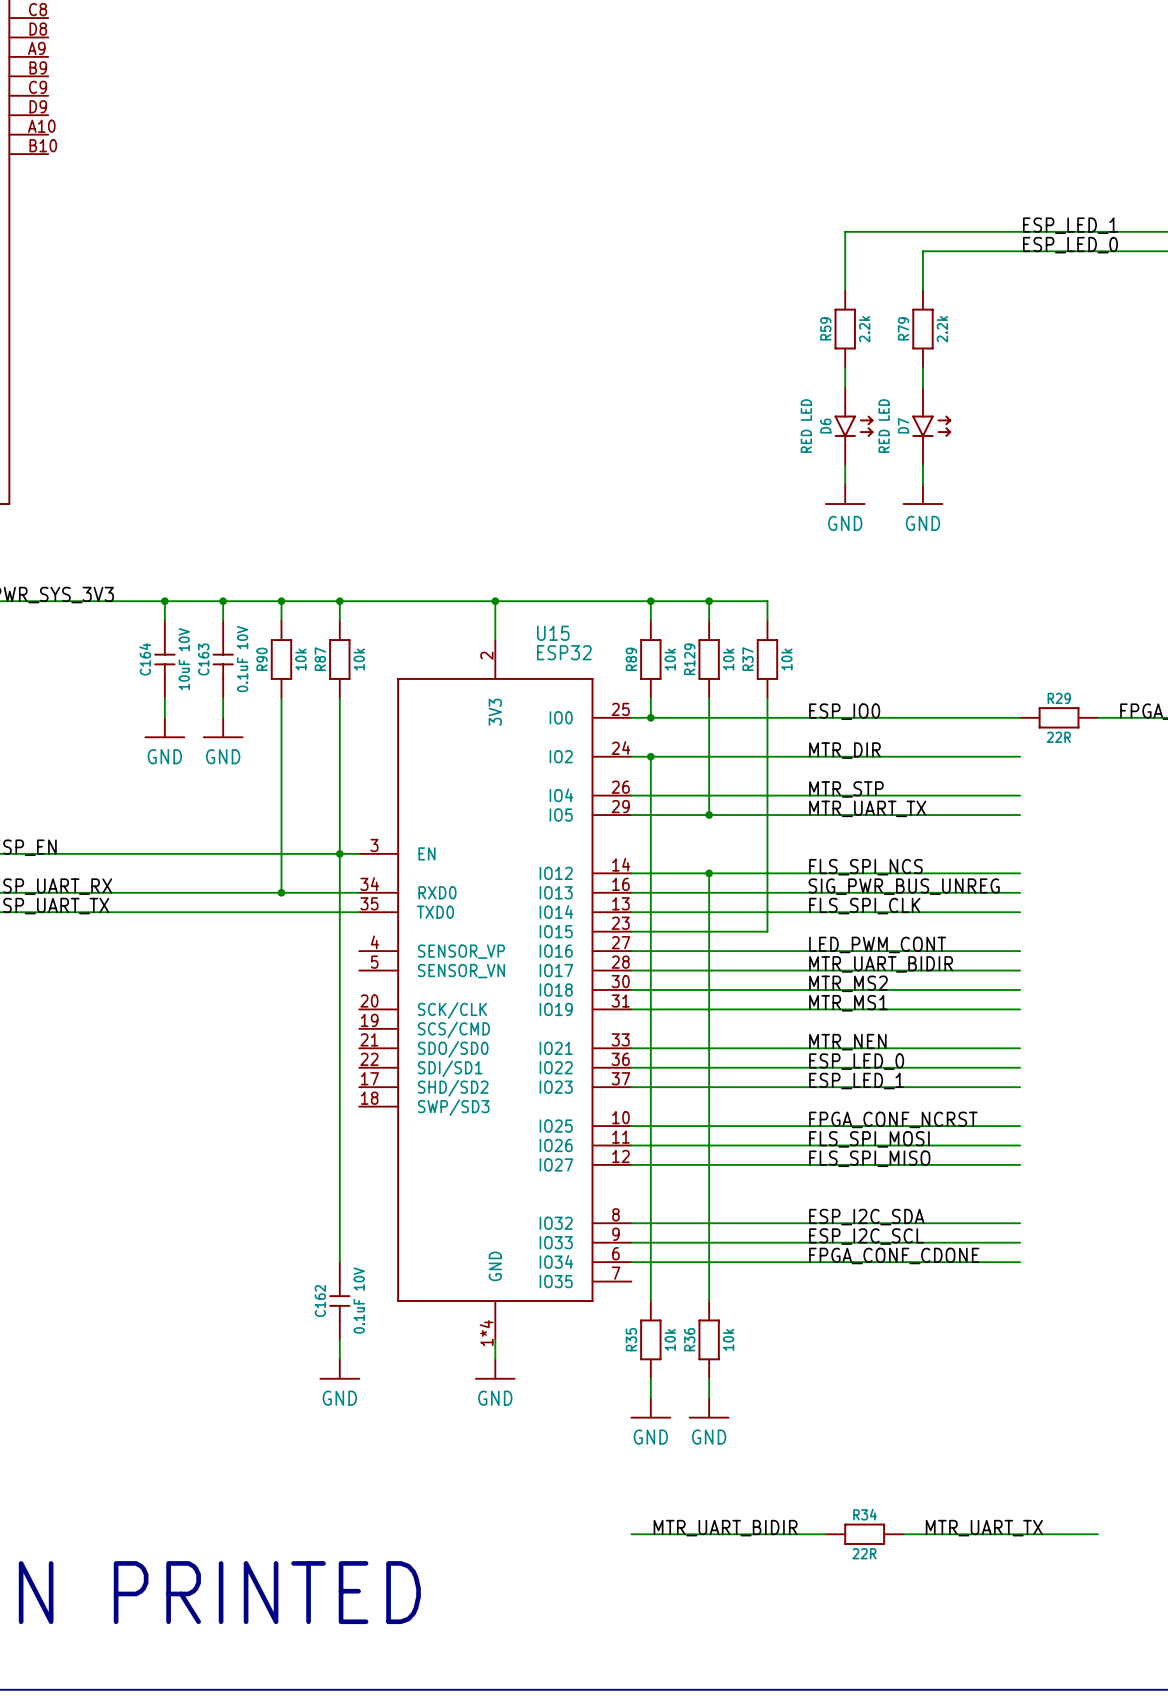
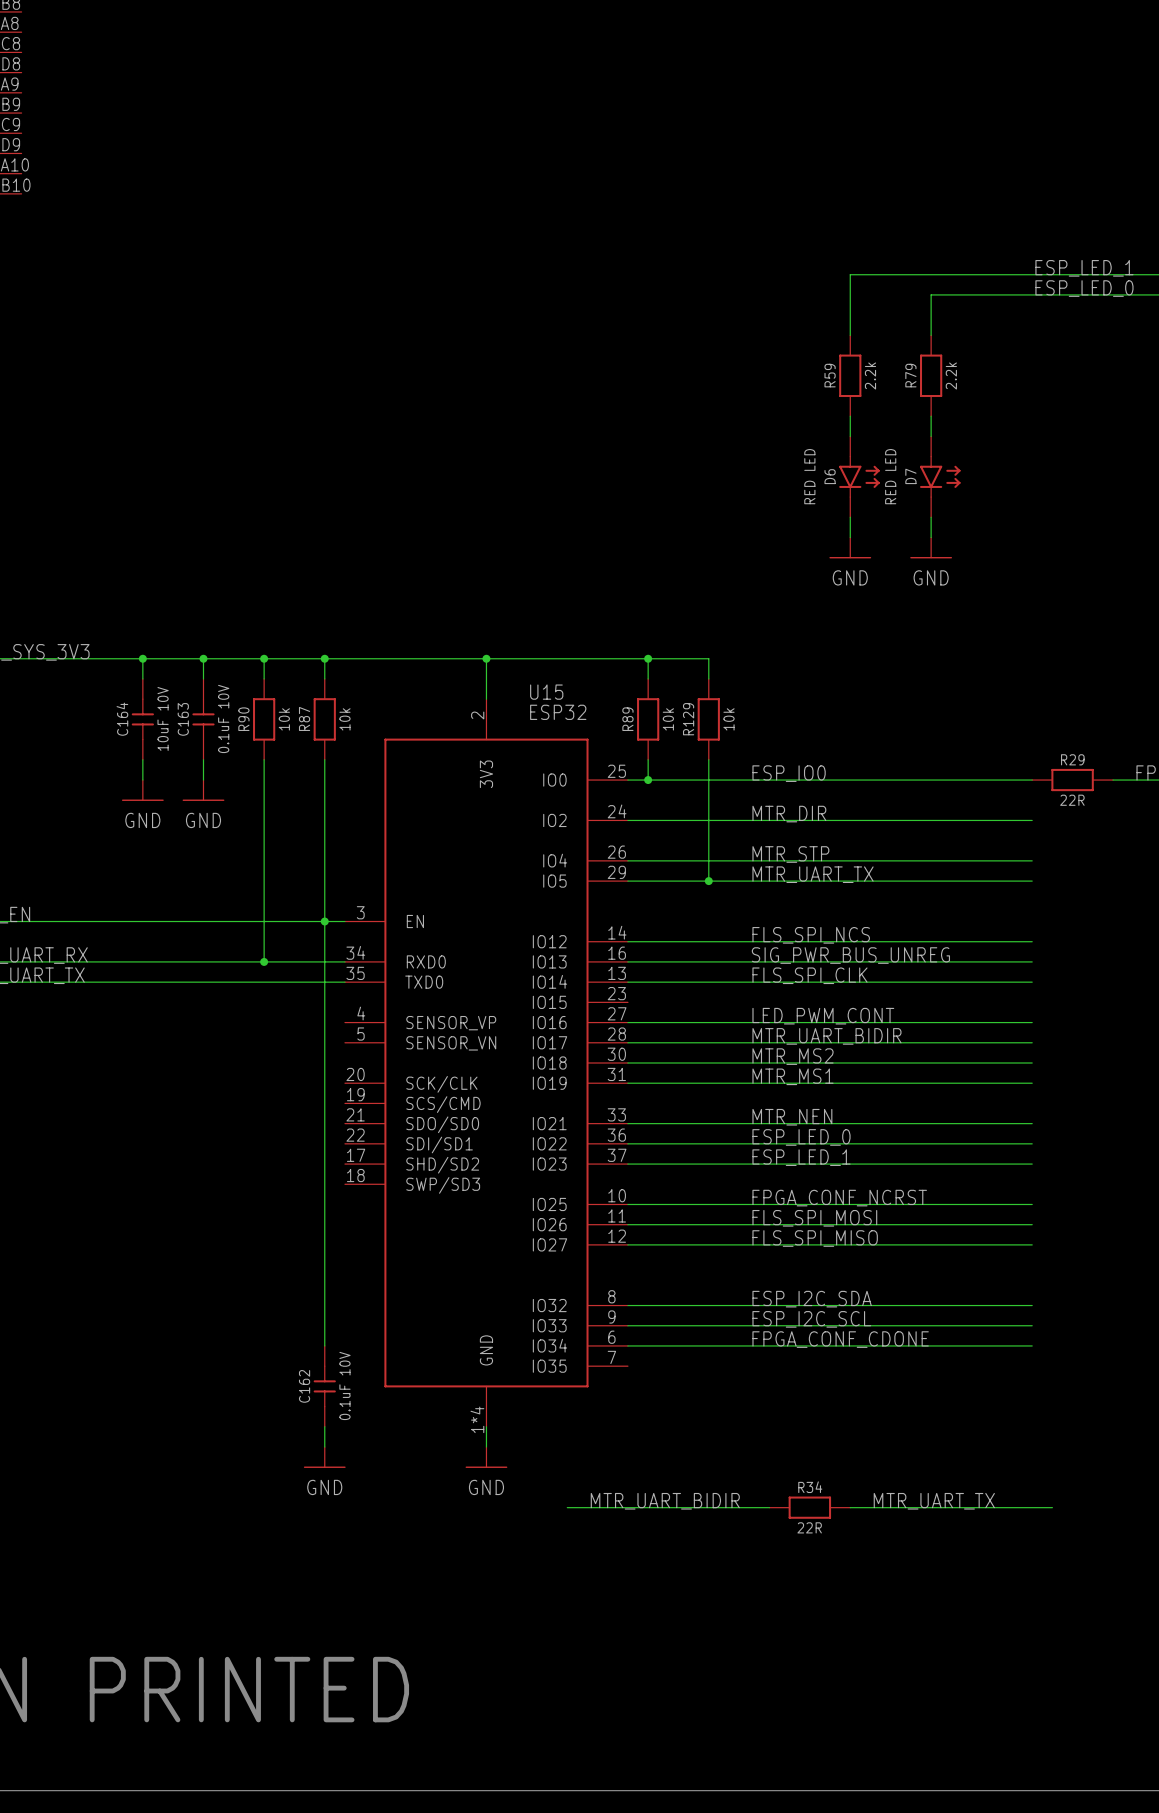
wire: (709, 601) (767, 601) (767, 620) -> none
junction: (709, 601) -> none
R37: 10k (767, 659) -> none
wire: (767, 698) (767, 931) (631, 931) -> none
label position: ESP_IO0 (844, 711) -> ESP_IO0 (789, 773)
label position: MTR_DIR (844, 750) -> MTR_DIR (789, 814)
wire: (650, 756) (650, 1301) -> none
junction: (650, 756) -> none
label position: MTR_STP (846, 789) -> MTR_STP (790, 854)
label position: MTR_UART_TX (867, 808) -> MTR_UART_TX (813, 874)
label position: FLS_SPI_NCS (865, 867) -> FLS_SPI_NCS (811, 935)
wire: (709, 873) (709, 1301) -> none
junction: (709, 873) -> none
label position: SIG_PWR_BUS_UNREG (904, 886) -> SIG_PWR_BUS_UNREG (850, 955)
label position: FLS_SPI_CLK (864, 906) -> FLS_SPI_CLK (809, 975)
label position: LED_PWM_CONT (877, 944) -> LED_PWM_CONT (823, 1016)
label position: MTR_UART_BIDIR (881, 964) -> MTR_UART_BIDIR (826, 1036)
label position: MTR_MS2 (848, 983) -> MTR_MS2 (793, 1056)
label position: MTR_MS1 (848, 1003) -> MTR_MS1 (793, 1076)
label position: MTR_NEN (847, 1042) -> MTR_NEN (792, 1117)
label position: ESP_LED_0 (856, 1061) -> ESP_LED_0 (801, 1137)
label position: ESP_LED_1 (856, 1081) -> ESP_LED_1 (801, 1157)
label position: FPGA_CONF_NCRST (893, 1119) -> FPGA_CONF_NCRST (839, 1198)
label position: FLS_SPI_MOSI (869, 1139) -> FLS_SPI_MOSI (814, 1218)
label position: FLS_SPI_MISO (869, 1158) -> FLS_SPI_MISO (815, 1238)
label position: ESP_I2C_SDA (866, 1217) -> ESP_I2C_SDA (812, 1299)
label position: ESP_I2C_SCL (866, 1236) -> ESP_I2C_SCL (811, 1319)
label position: FPGA_CONF_CDONE (894, 1255) -> FPGA_CONF_CDONE (840, 1339)
R35: 10k (650, 1339) -> none
R36: 10k (709, 1339) -> none
wire: (650, 1378) (650, 1398) -> none
wire: (709, 1378) (709, 1398) -> none
power symbol: GND (650, 1408) -> none
power symbol: GND (709, 1408) -> none
label position: MTR_UART_BIDIR (725, 1528) -> MTR_UART_BIDIR (665, 1501)
label position: MTR_UART_TX (984, 1528) -> MTR_UART_TX (934, 1501)
wire: (631, 1534) (825, 1534) -> (567, 1507) (769, 1507)
R34 position: (864, 1534) -> (809, 1507)
wire: (903, 1534) (1097, 1534) -> (850, 1507) (1052, 1507)

